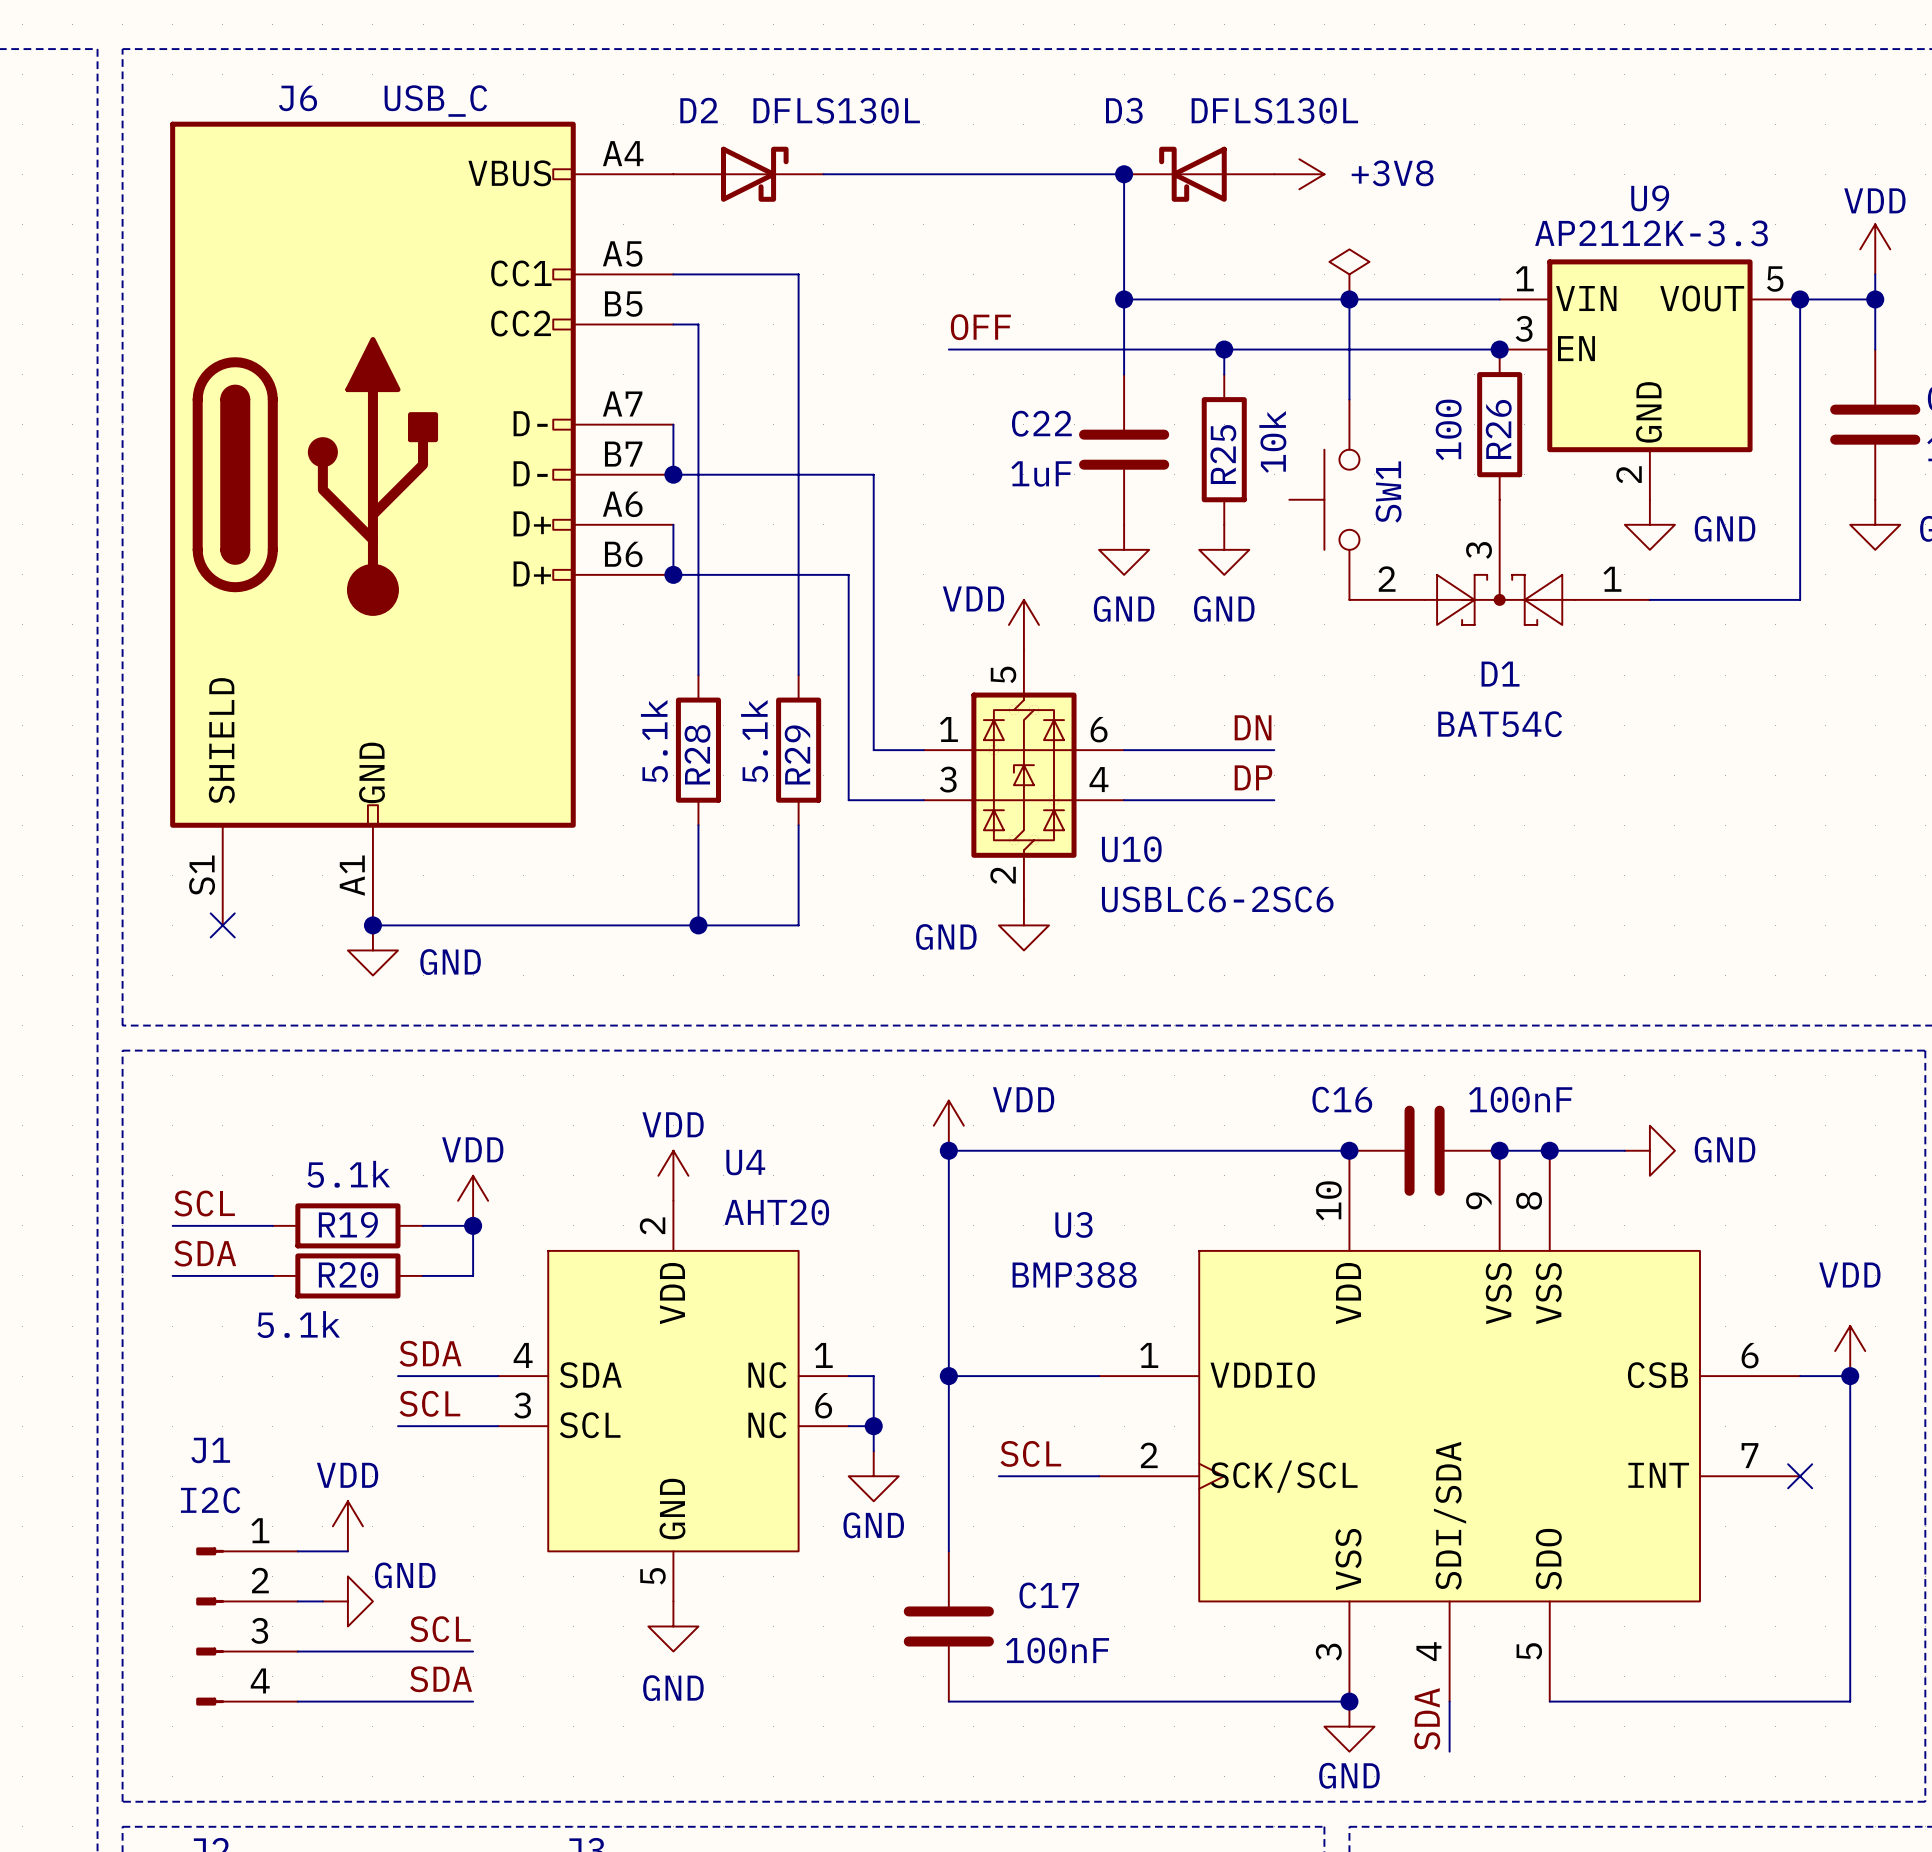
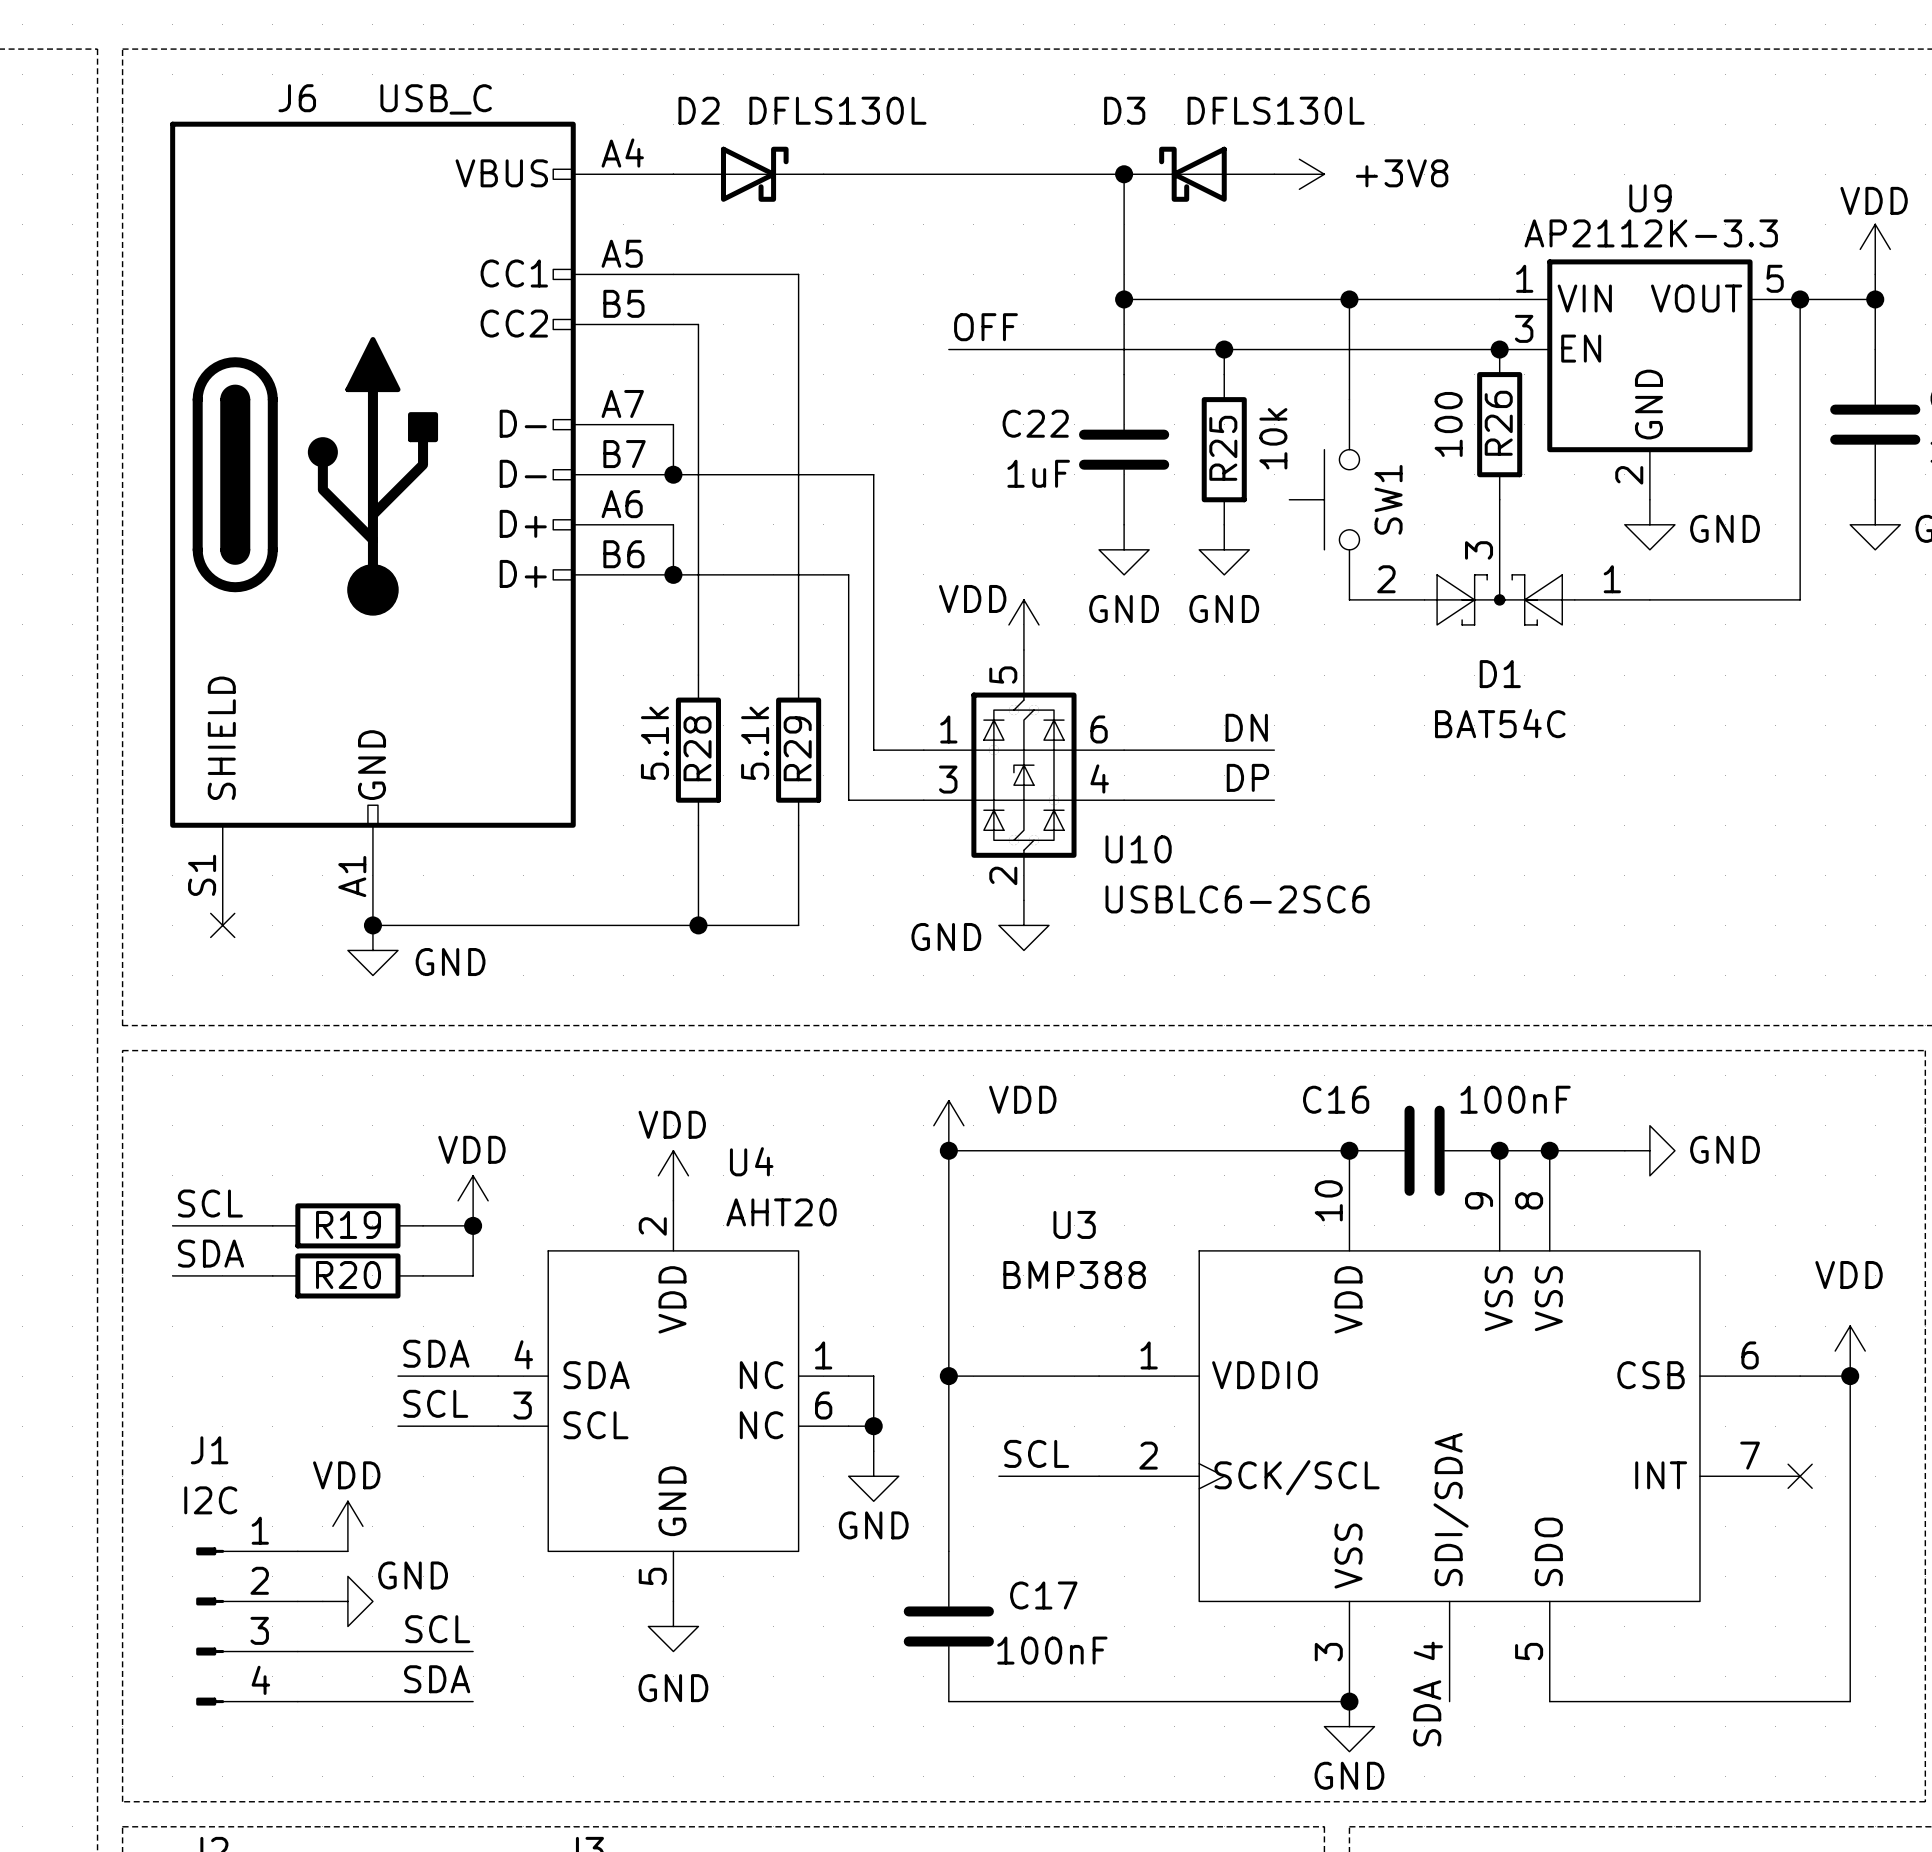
power symbol: (1349, 274) -> none
R19 value: 5.1k (348, 1174) -> none
R20 value: 5.1k (298, 1324) -> none
wire: (1449, 1701) (1449, 1751) -> none

